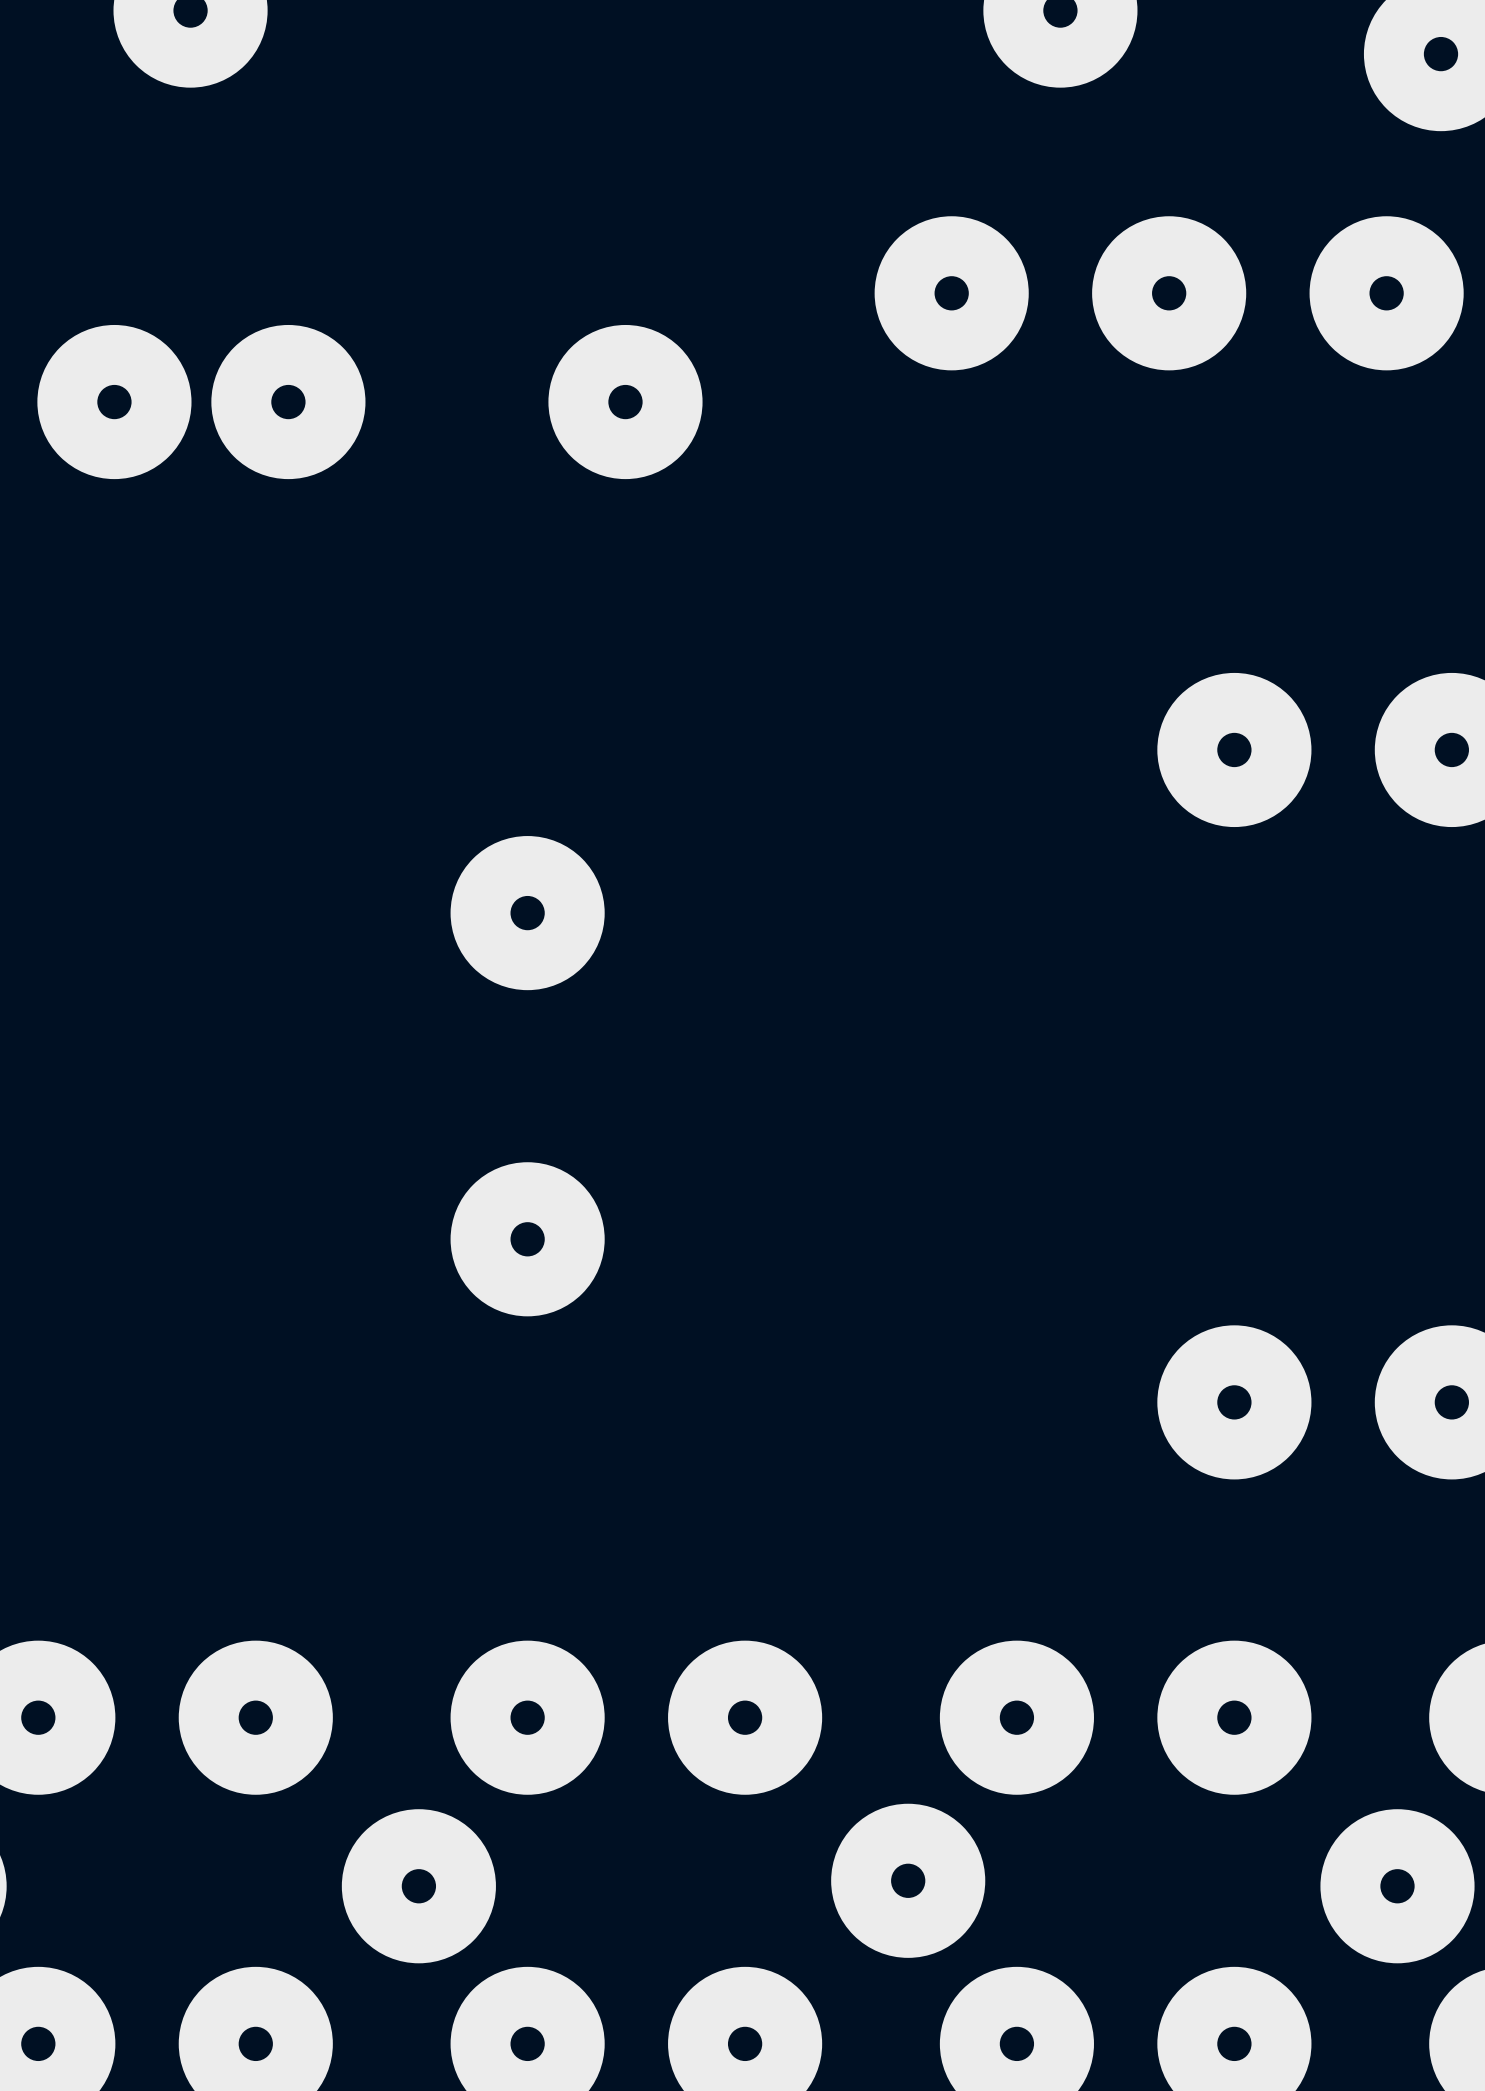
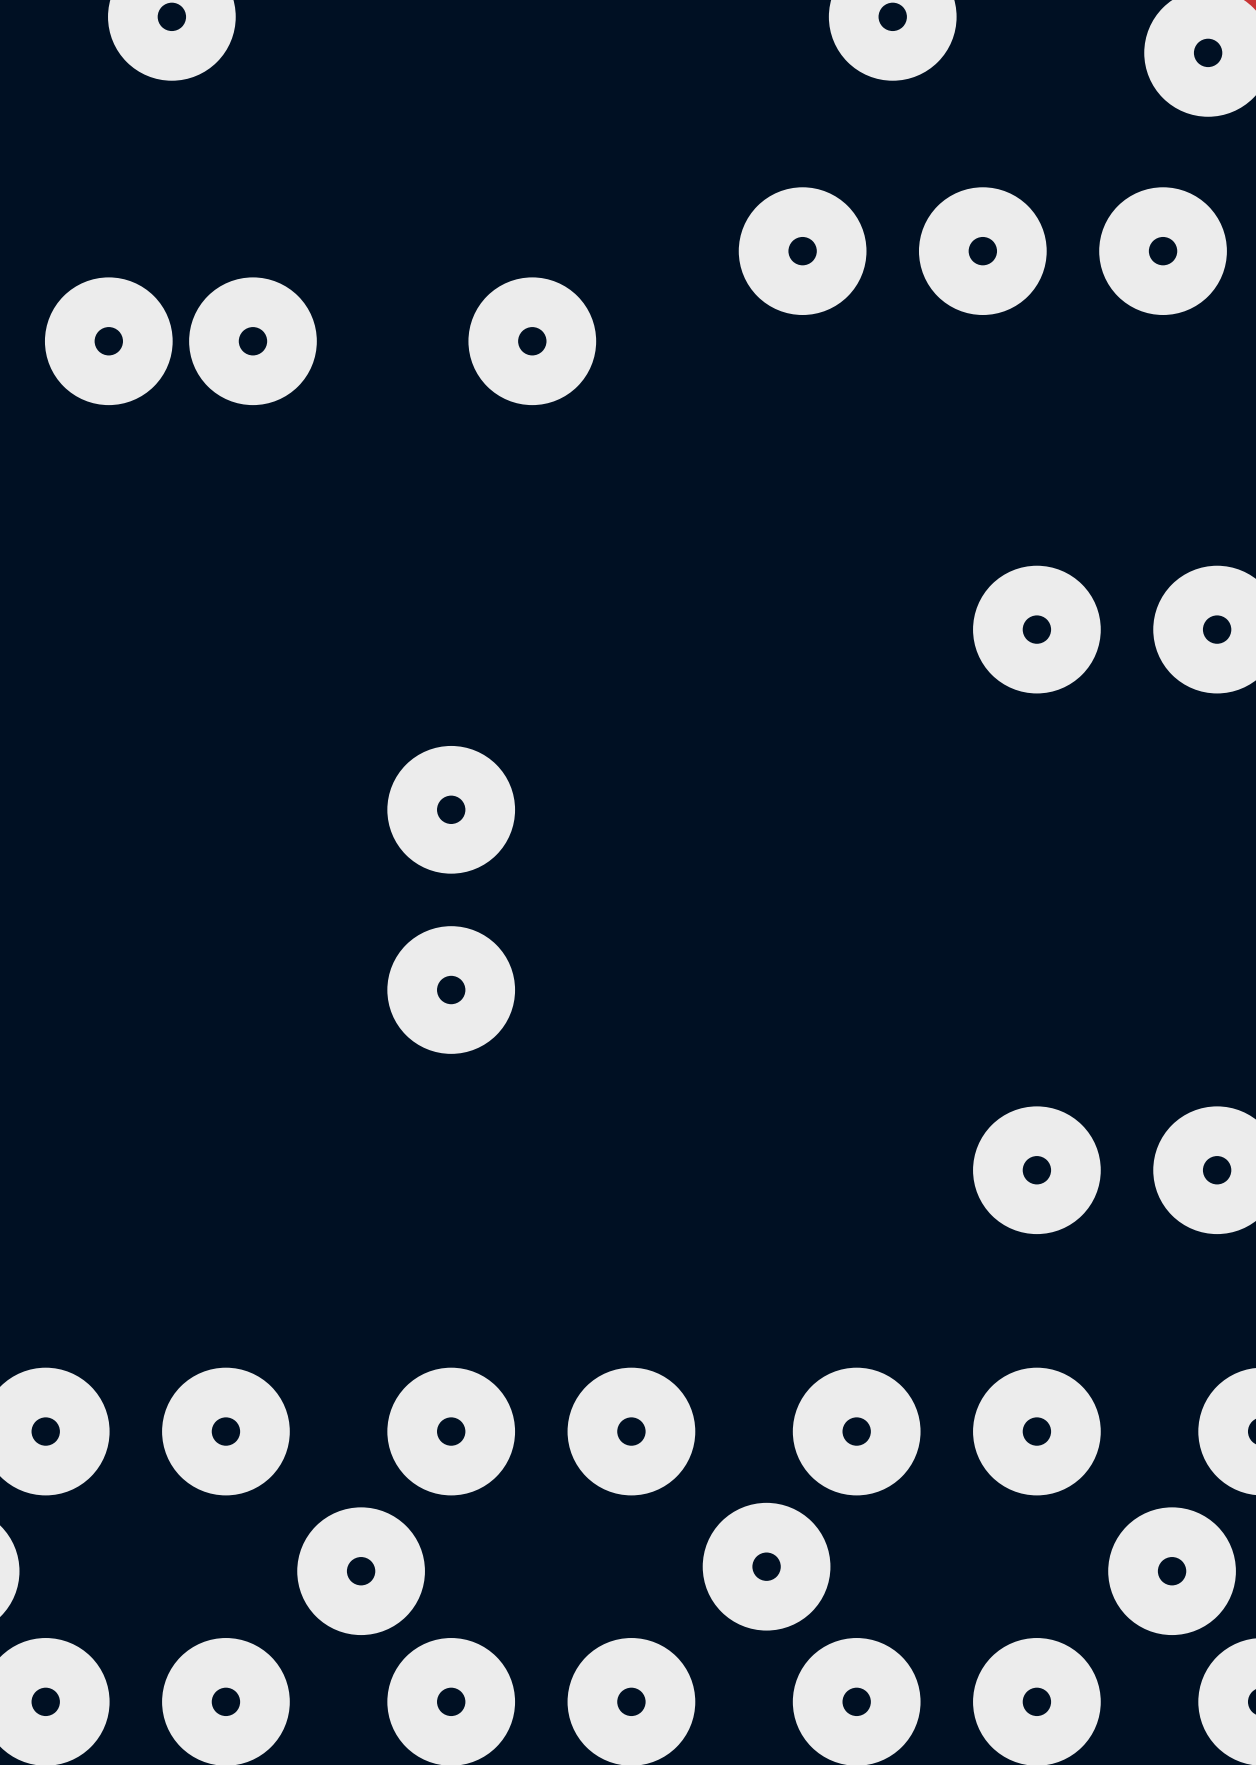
via position: (527, 913) -> (451, 809)
via position: (527, 1239) -> (451, 990)

